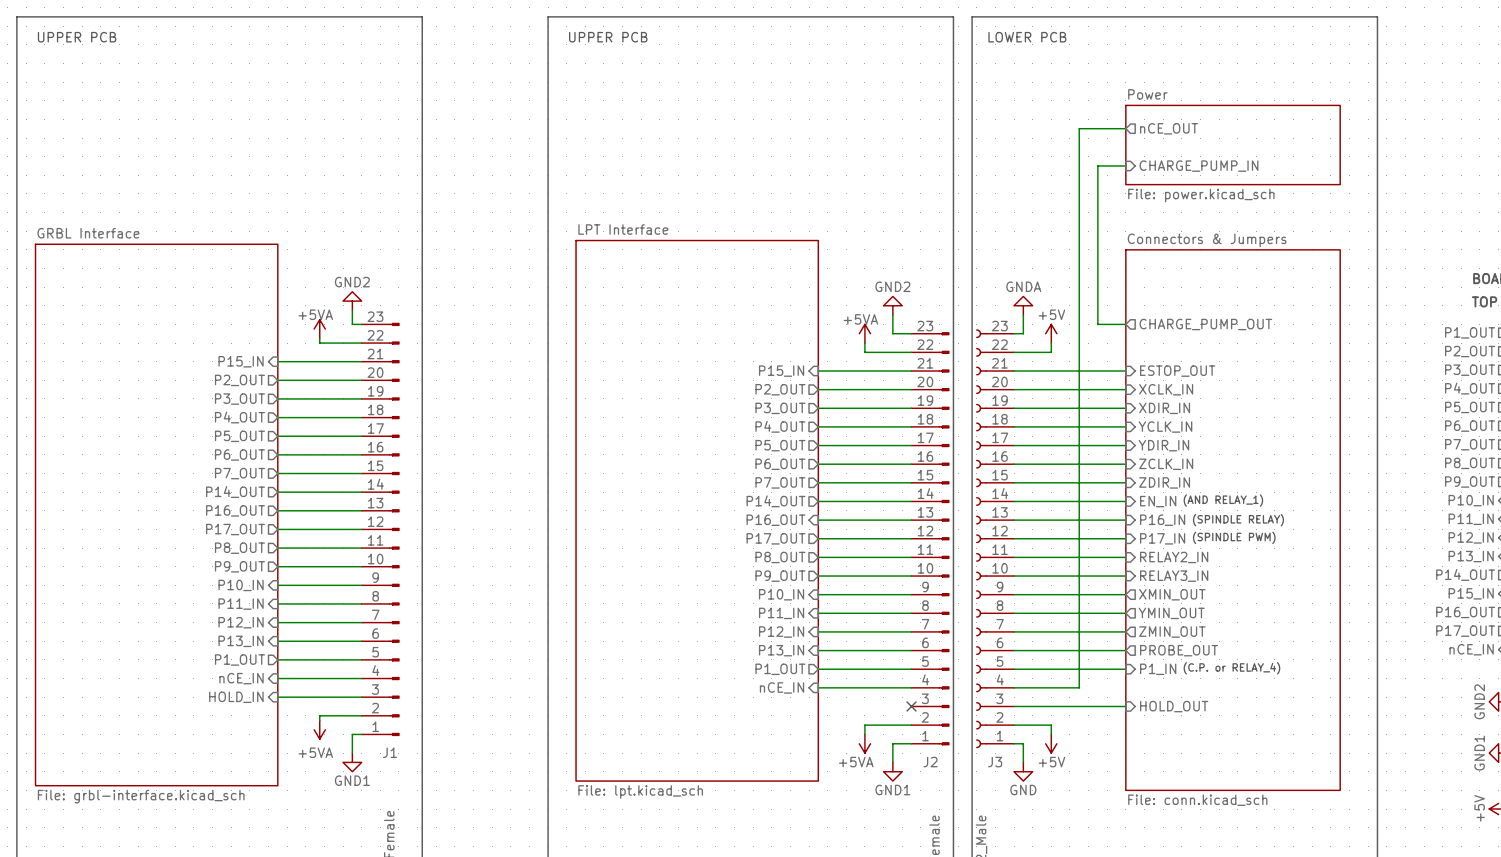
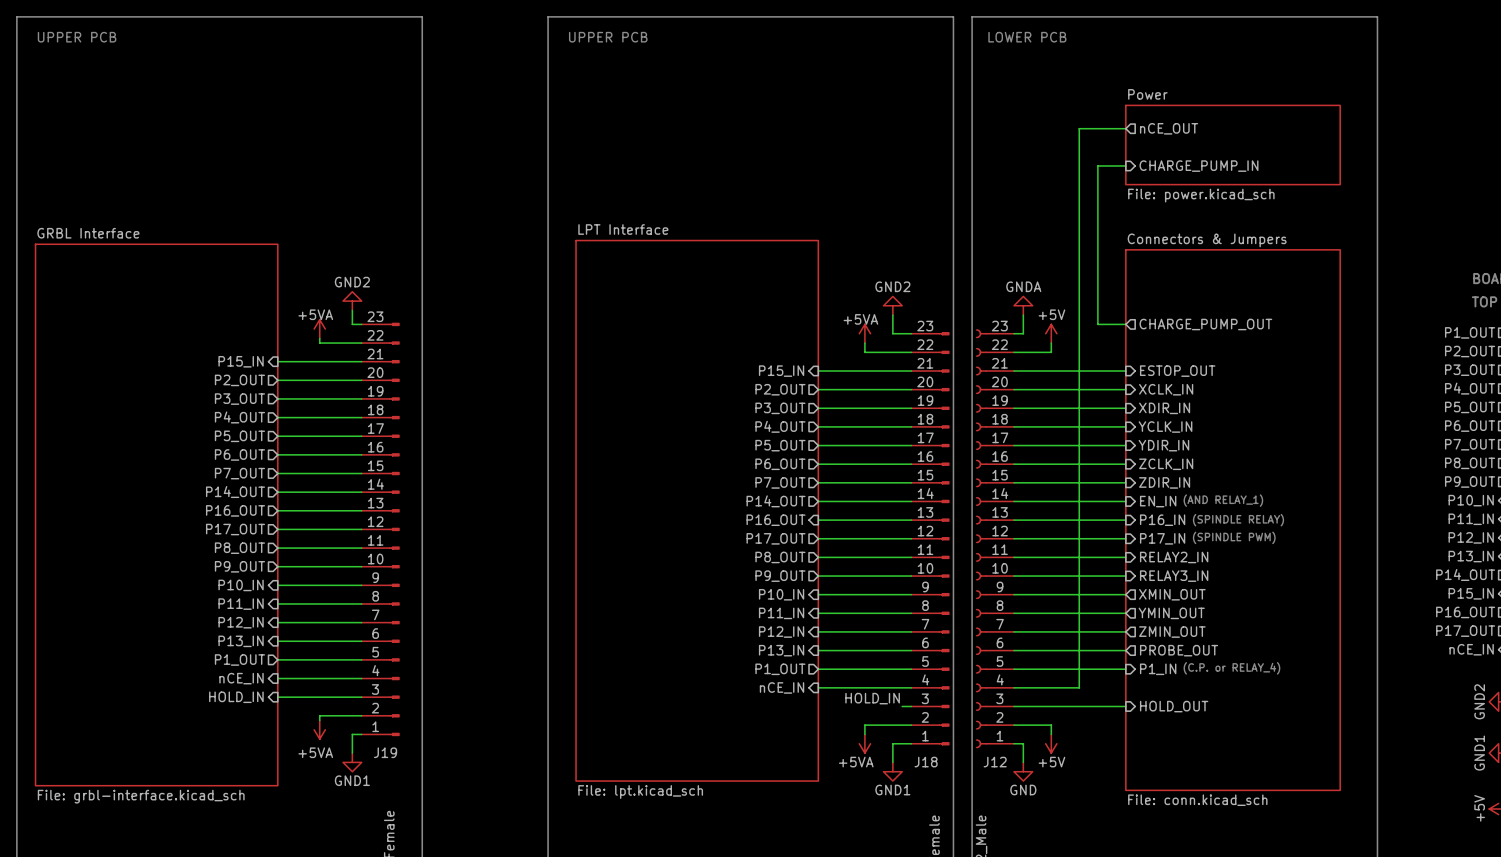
label: none -> HOLD_IN (872, 698)
wire: none -> (902, 706) (911, 706)
no-connect mark: (911, 706) -> none
J1 name: J1 (390, 752) -> J19 (385, 752)
J2 name: J2 (930, 762) -> J18 (926, 762)
J3 name: J3 (995, 762) -> J12 (995, 762)

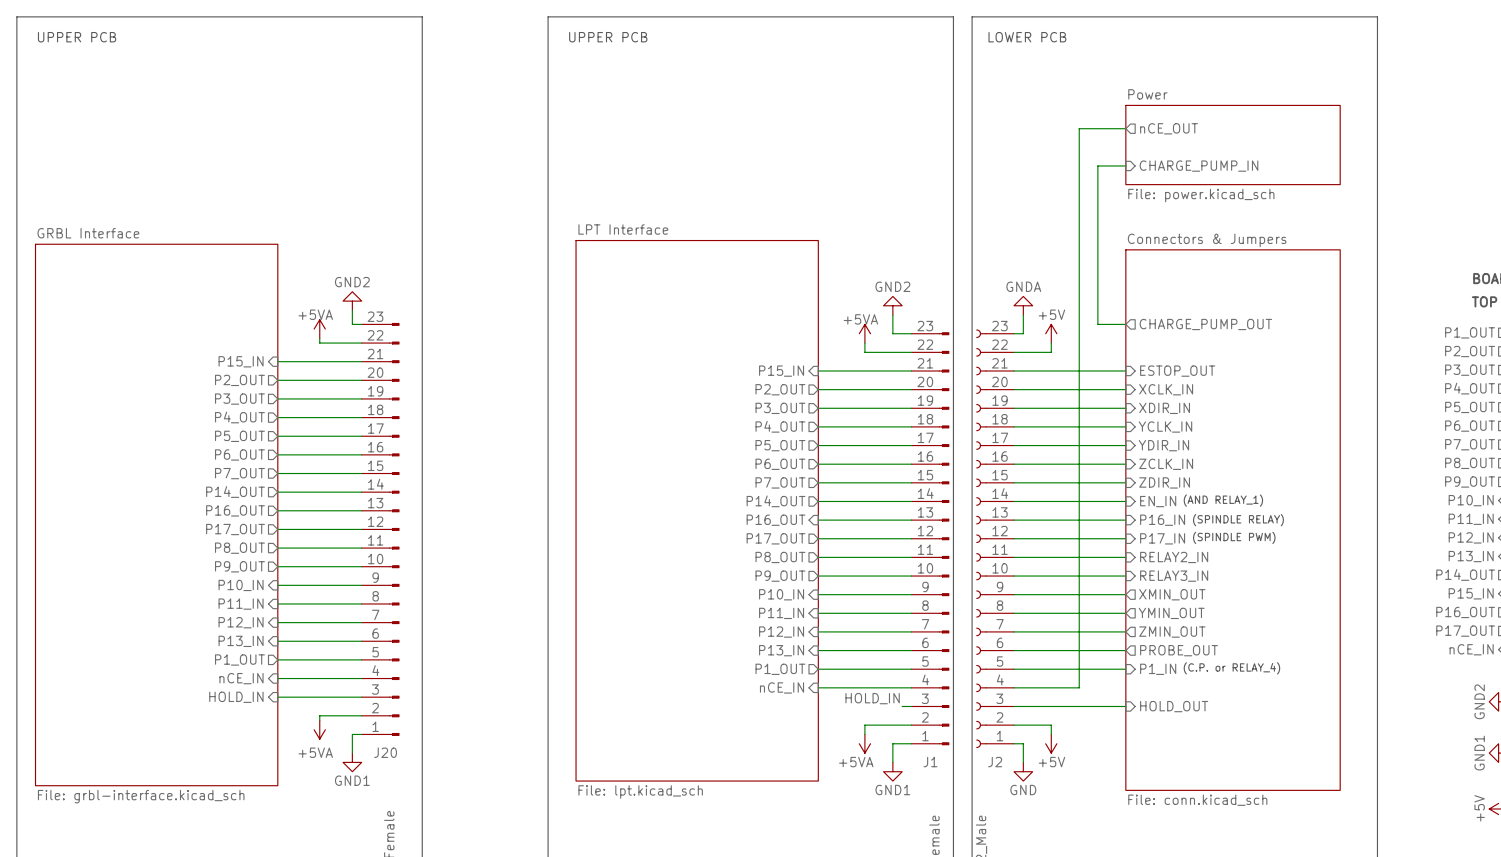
J19 name: J19 (385, 752) -> J20 (385, 752)
J18 name: J18 (926, 762) -> J1 (930, 762)
J12 name: J12 (995, 762) -> J2 (995, 762)

